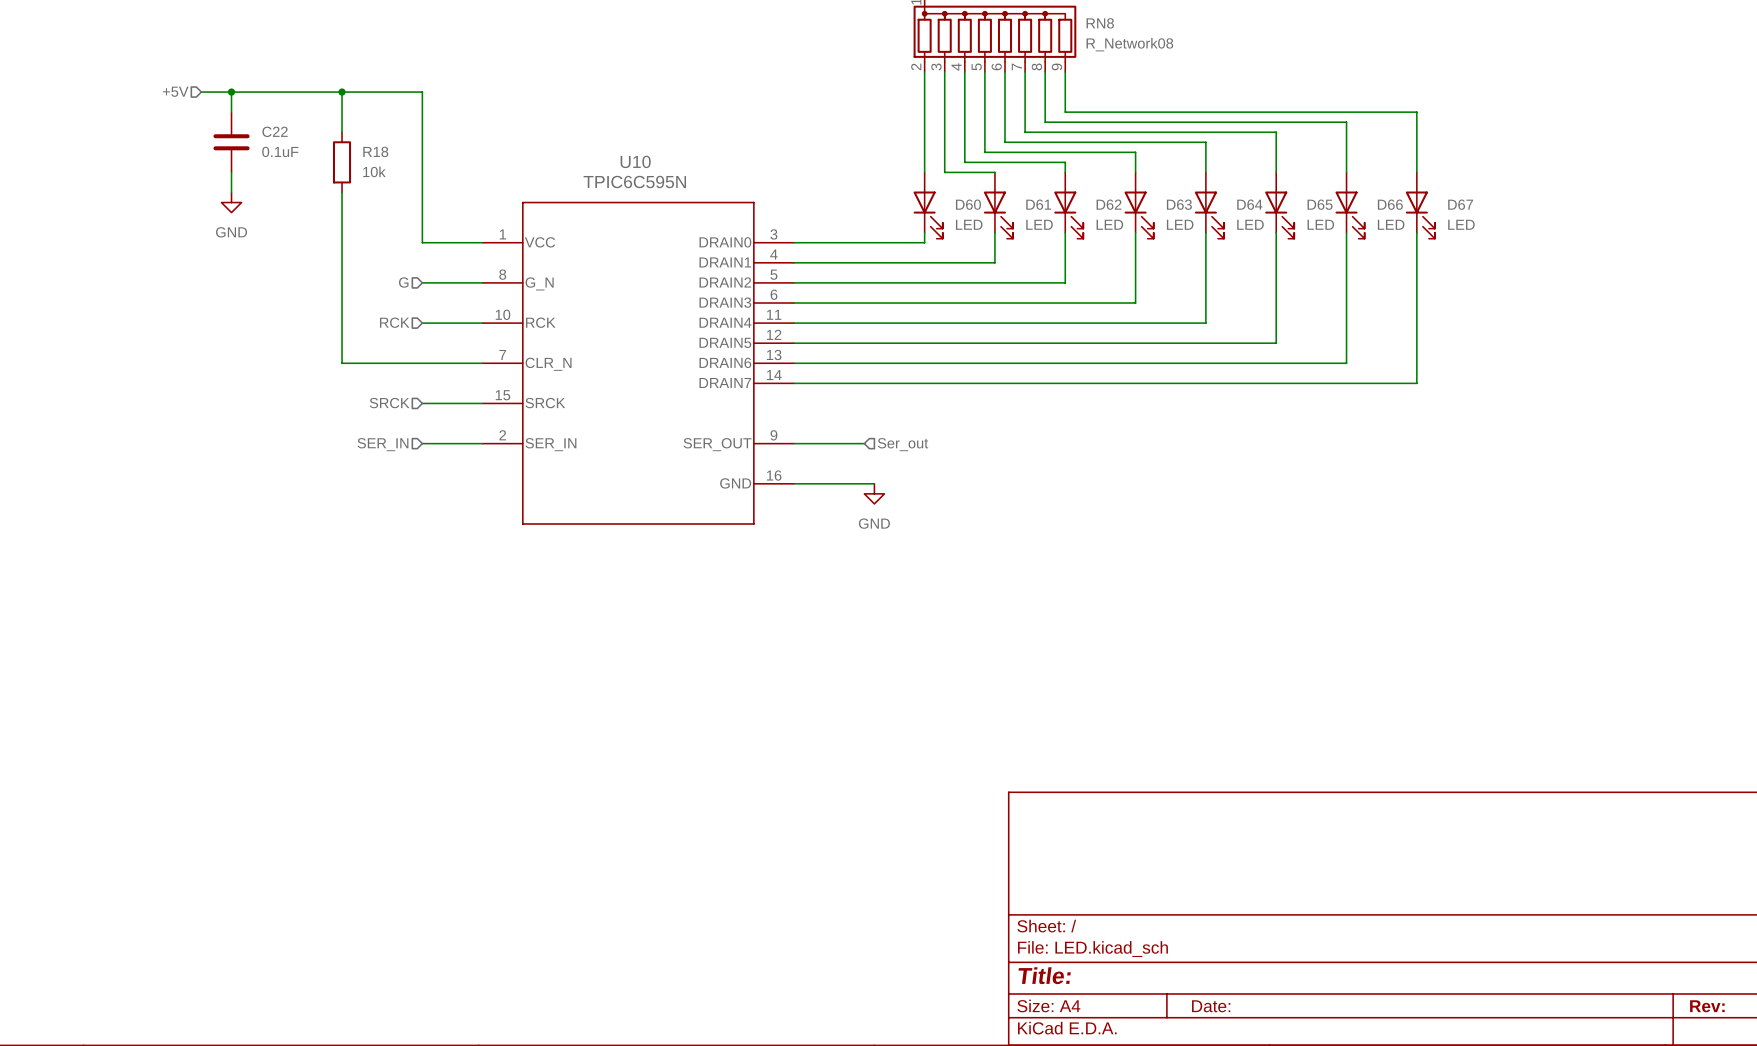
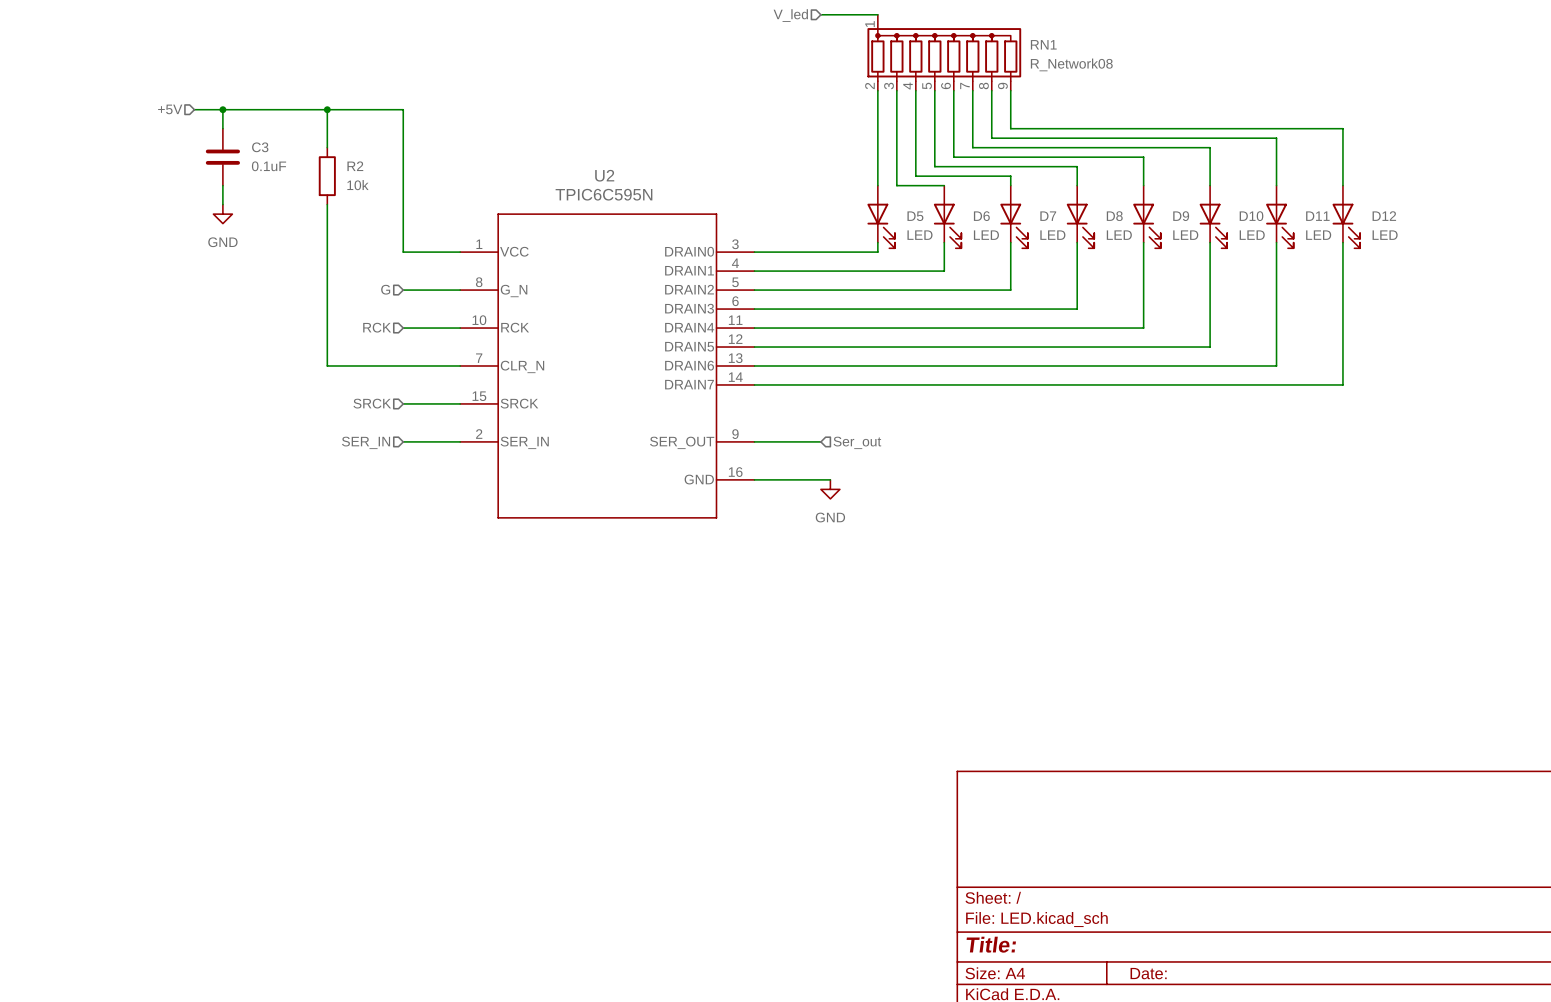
RN8 name: RN8 (1100, 23) -> RN1 (1043, 44)
C22 name: C22 (275, 131) -> C3 (260, 147)
R18 name: R18 (375, 151) -> R2 (355, 166)
U10 name: U10 (635, 161) -> U2 (604, 175)
D60 name: D60 (968, 204) -> D5 (915, 216)
D61 name: D61 (1038, 204) -> D6 (981, 216)
D62 name: D62 (1109, 204) -> D7 (1048, 216)
D63 name: D63 (1179, 204) -> D8 (1114, 216)
D64 name: D64 (1249, 204) -> D9 (1181, 216)
D65 name: D65 (1320, 204) -> D10 (1251, 216)
D66 name: D66 (1390, 204) -> D11 (1317, 216)
D67 name: D67 (1460, 204) -> D12 (1384, 216)

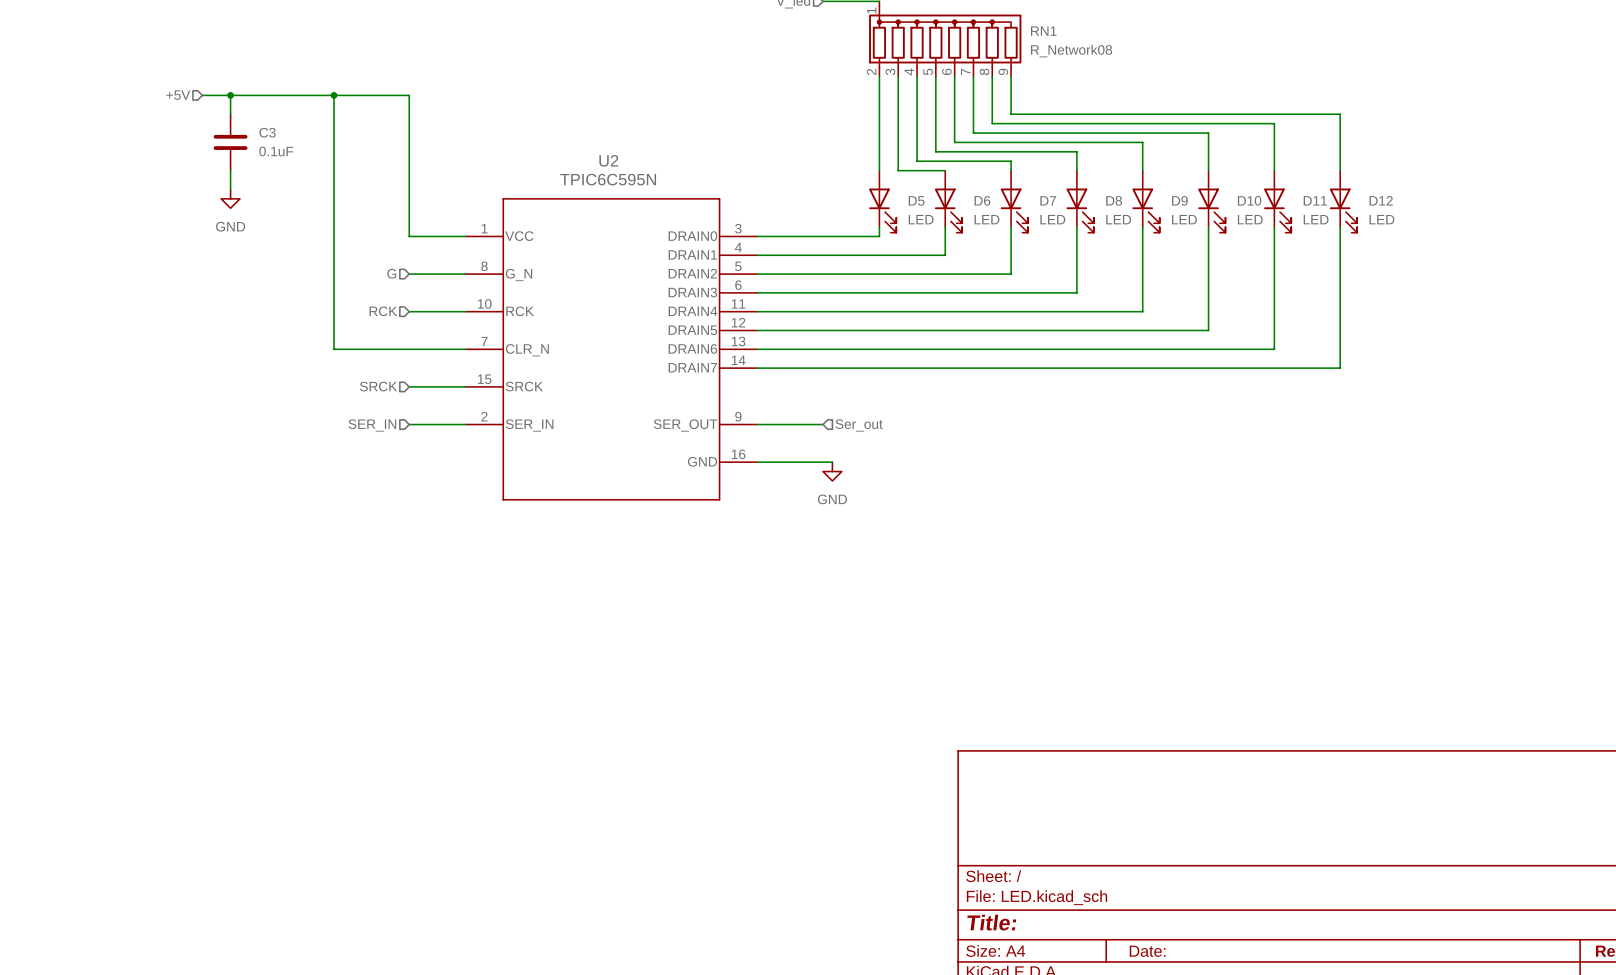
wire: none -> (334, 133) (334, 189)
R2: 10k (327, 176) -> none

